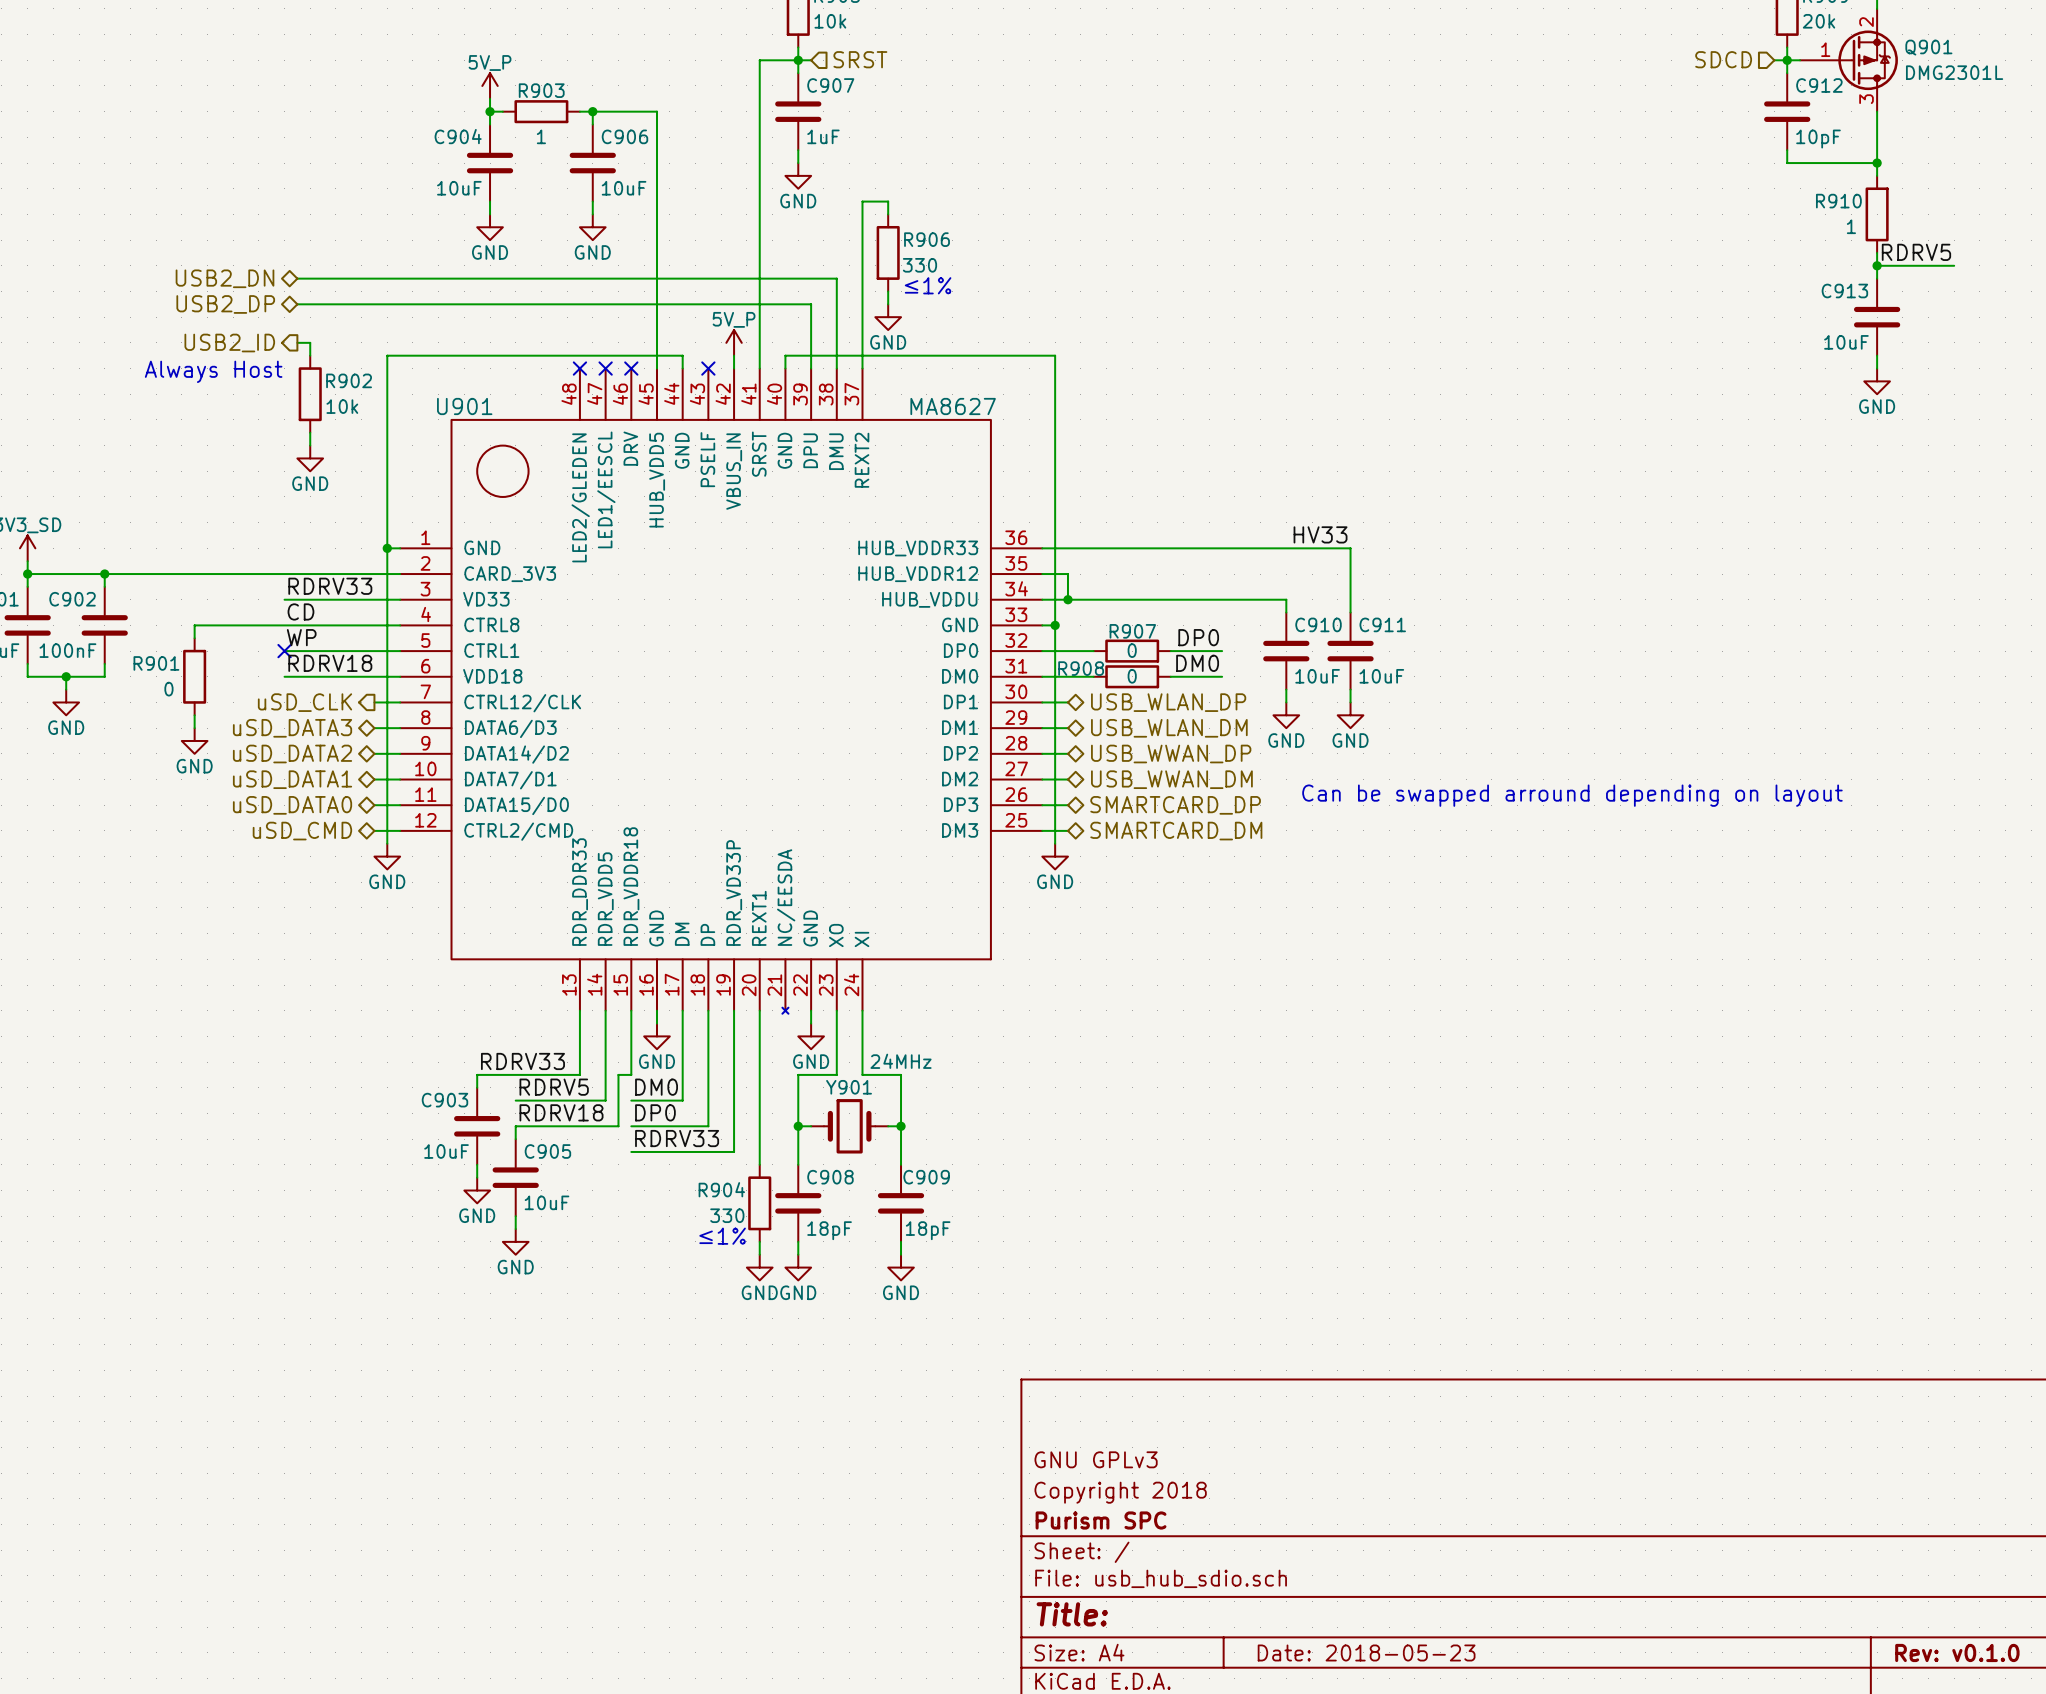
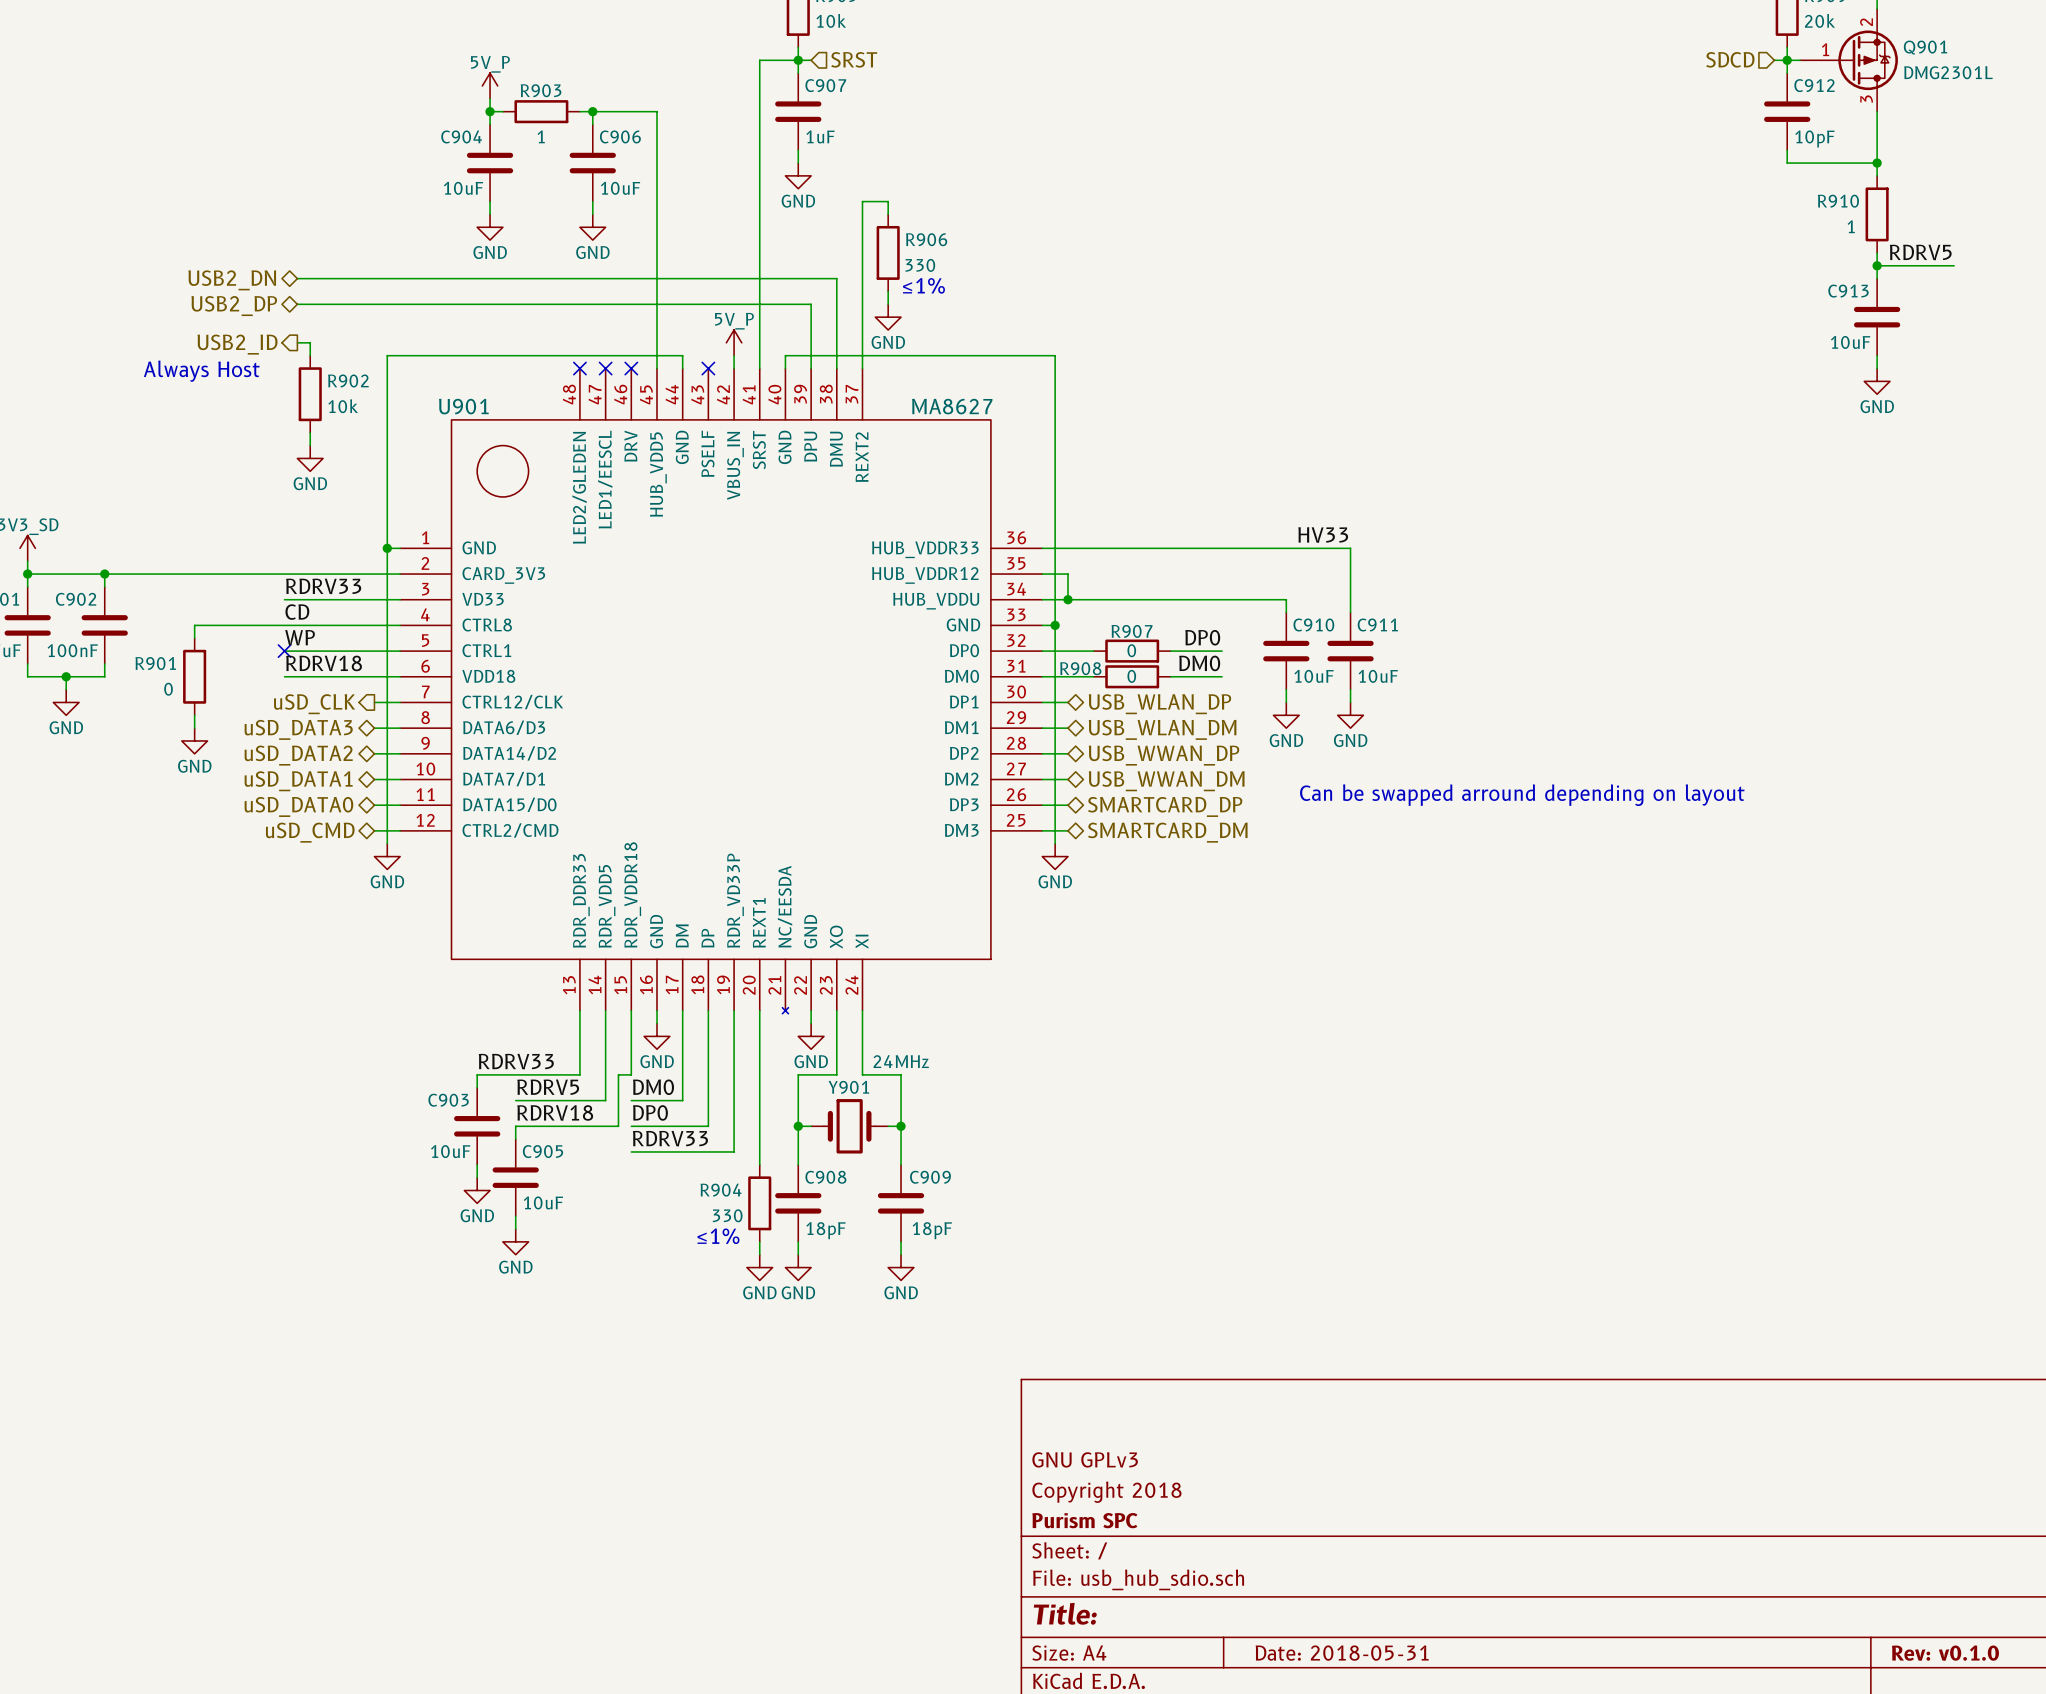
title block: Date: 2018-05-23 (1366, 1652) -> Date: 2018-05-31 (1342, 1653)

